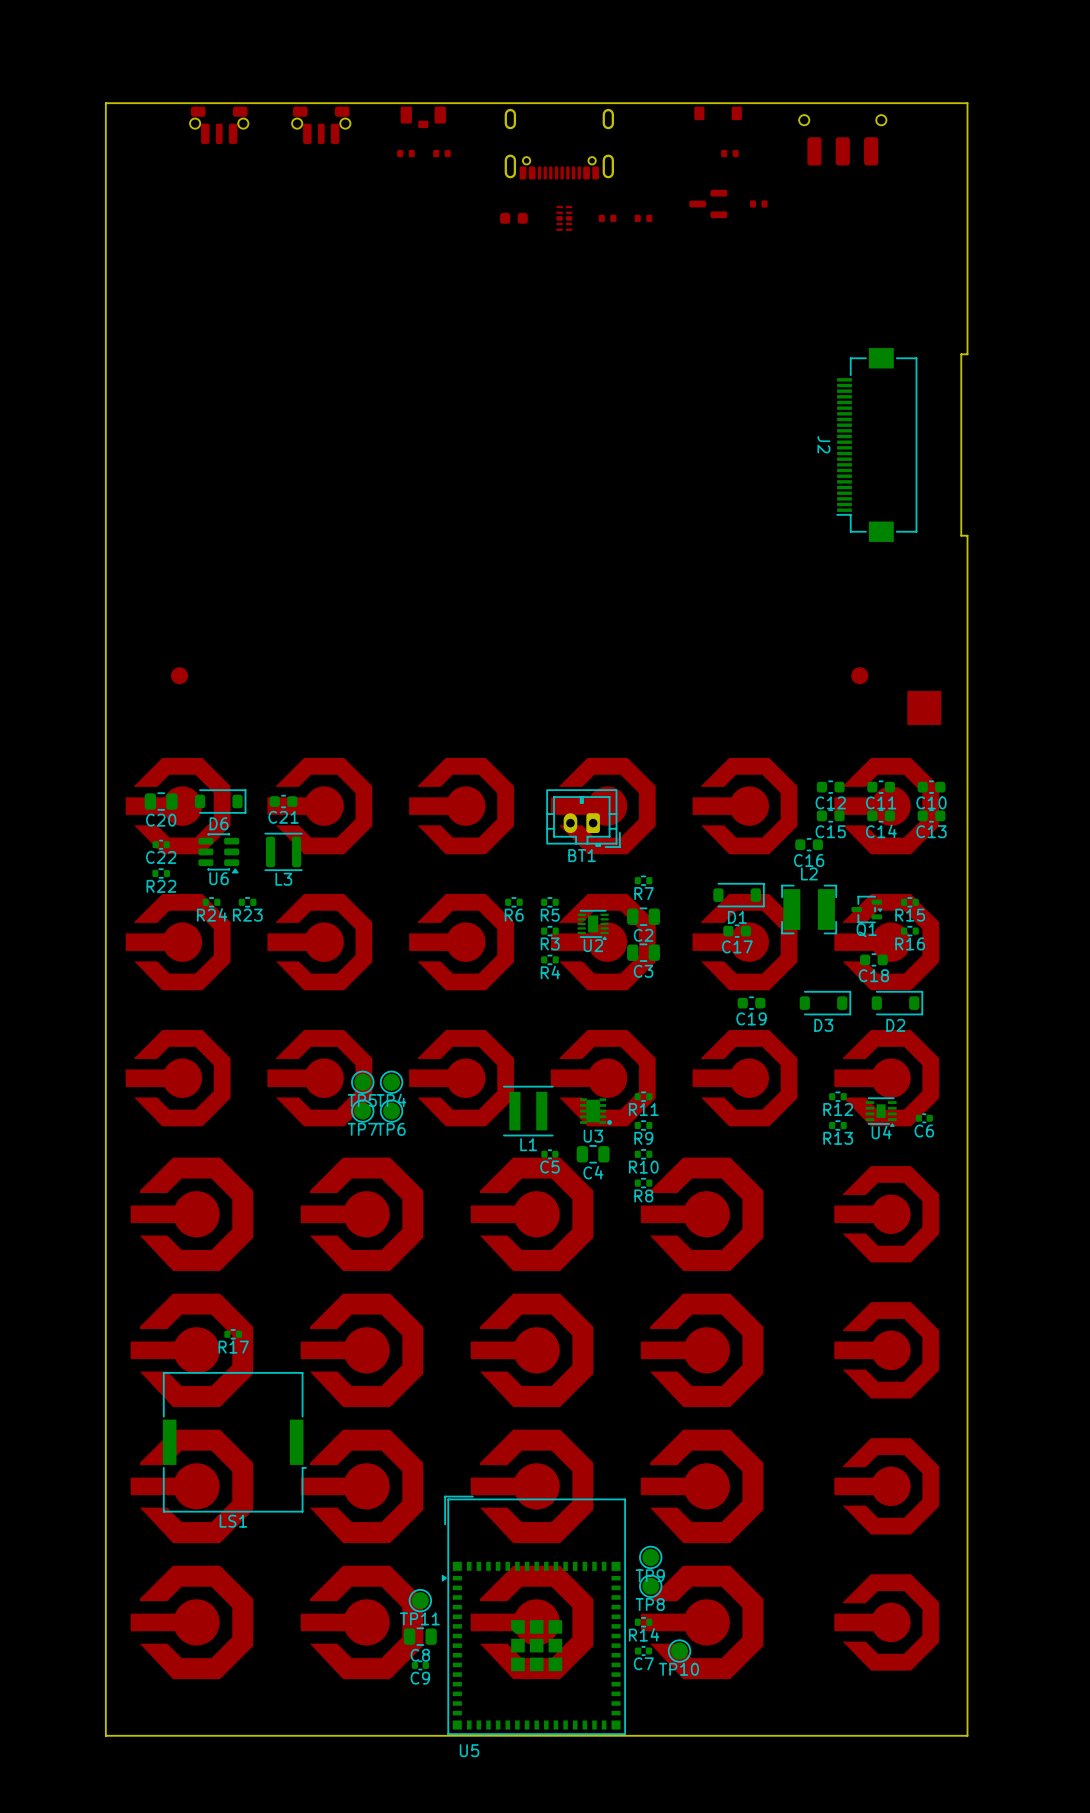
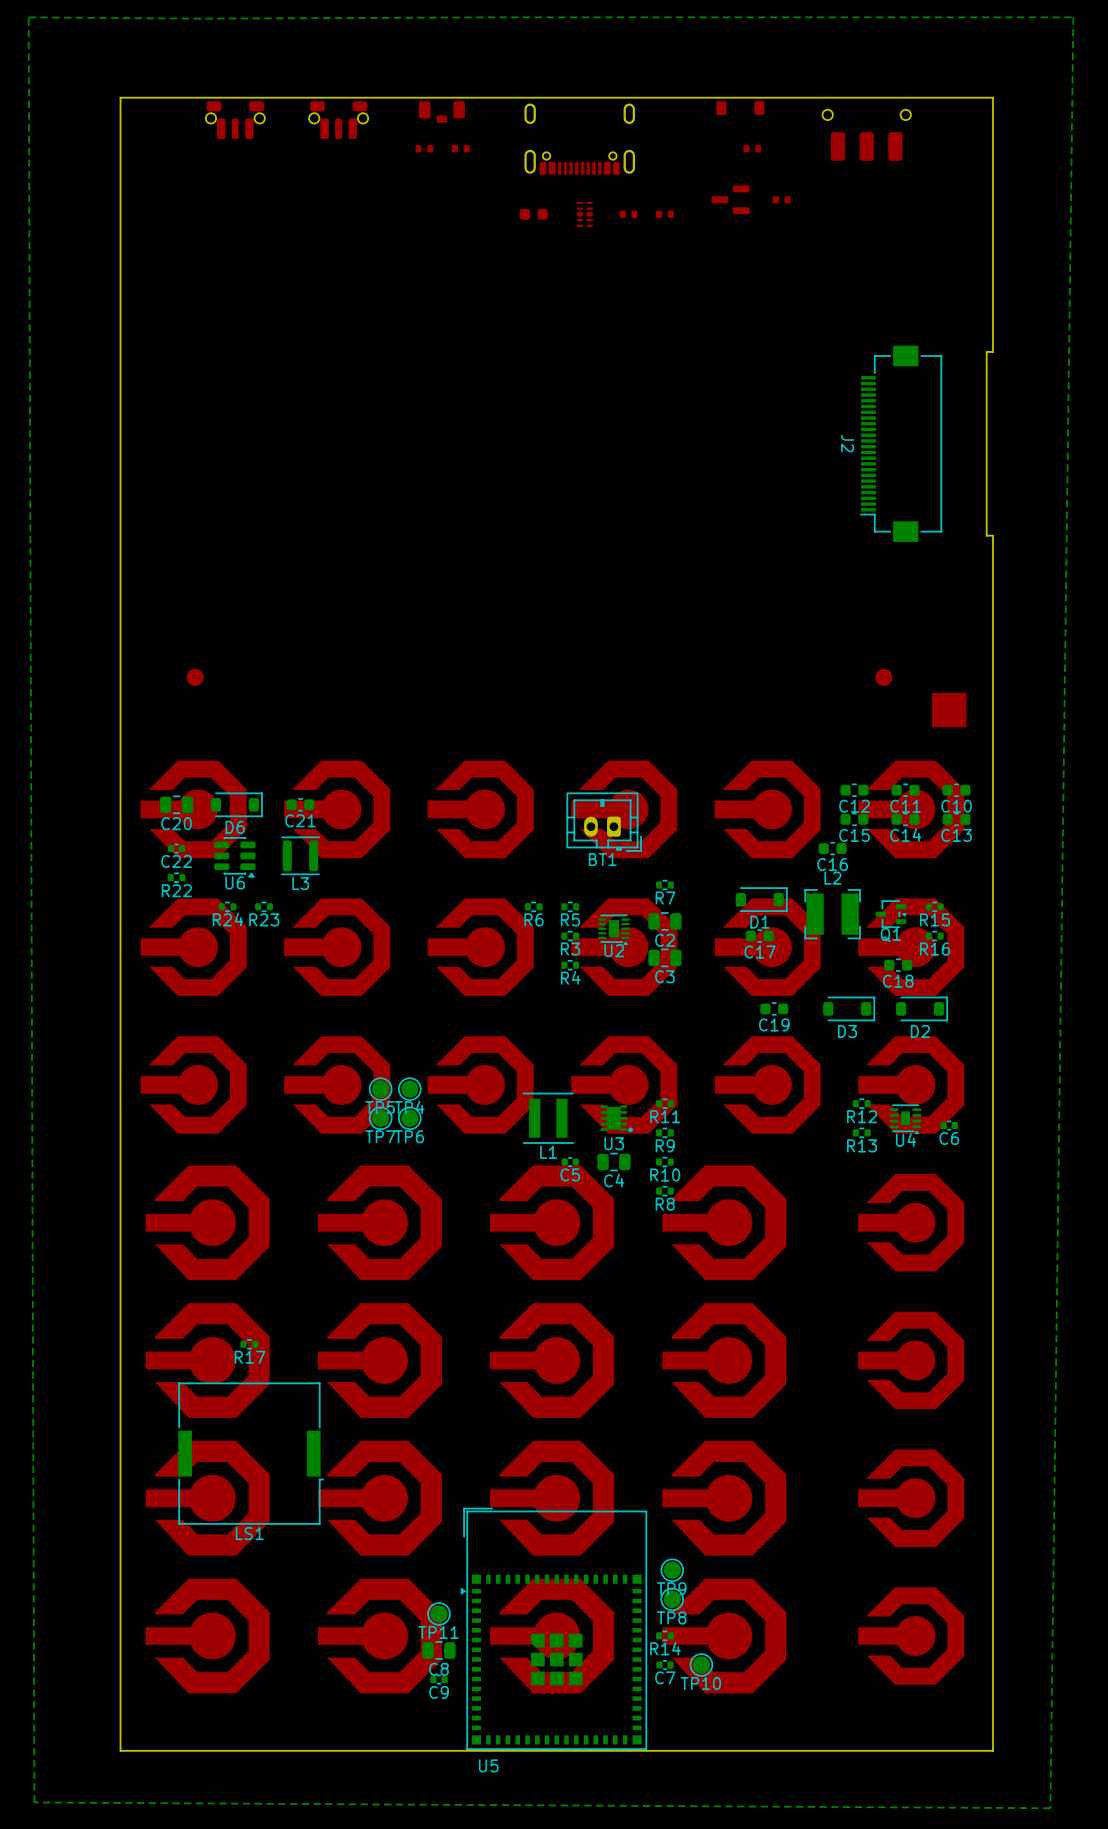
bottom zone outline: none -> (1073, 17) (28, 17) (34, 1802) (1050, 1808) (1073, 17)

